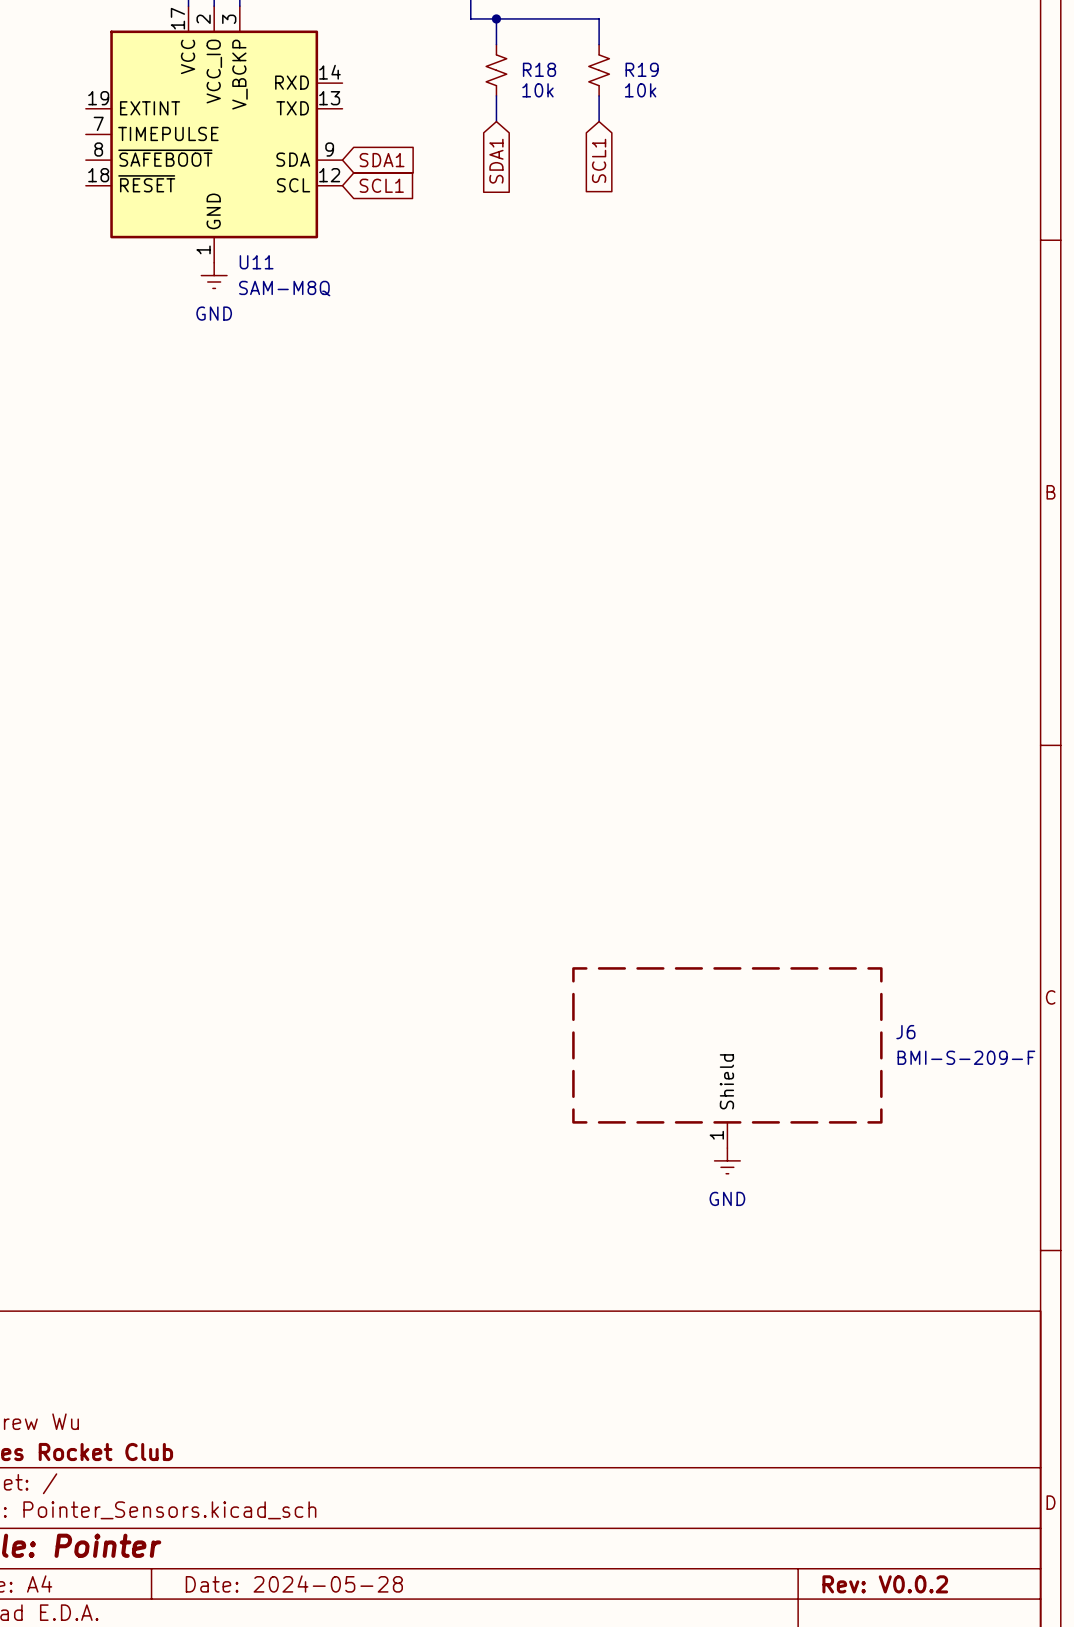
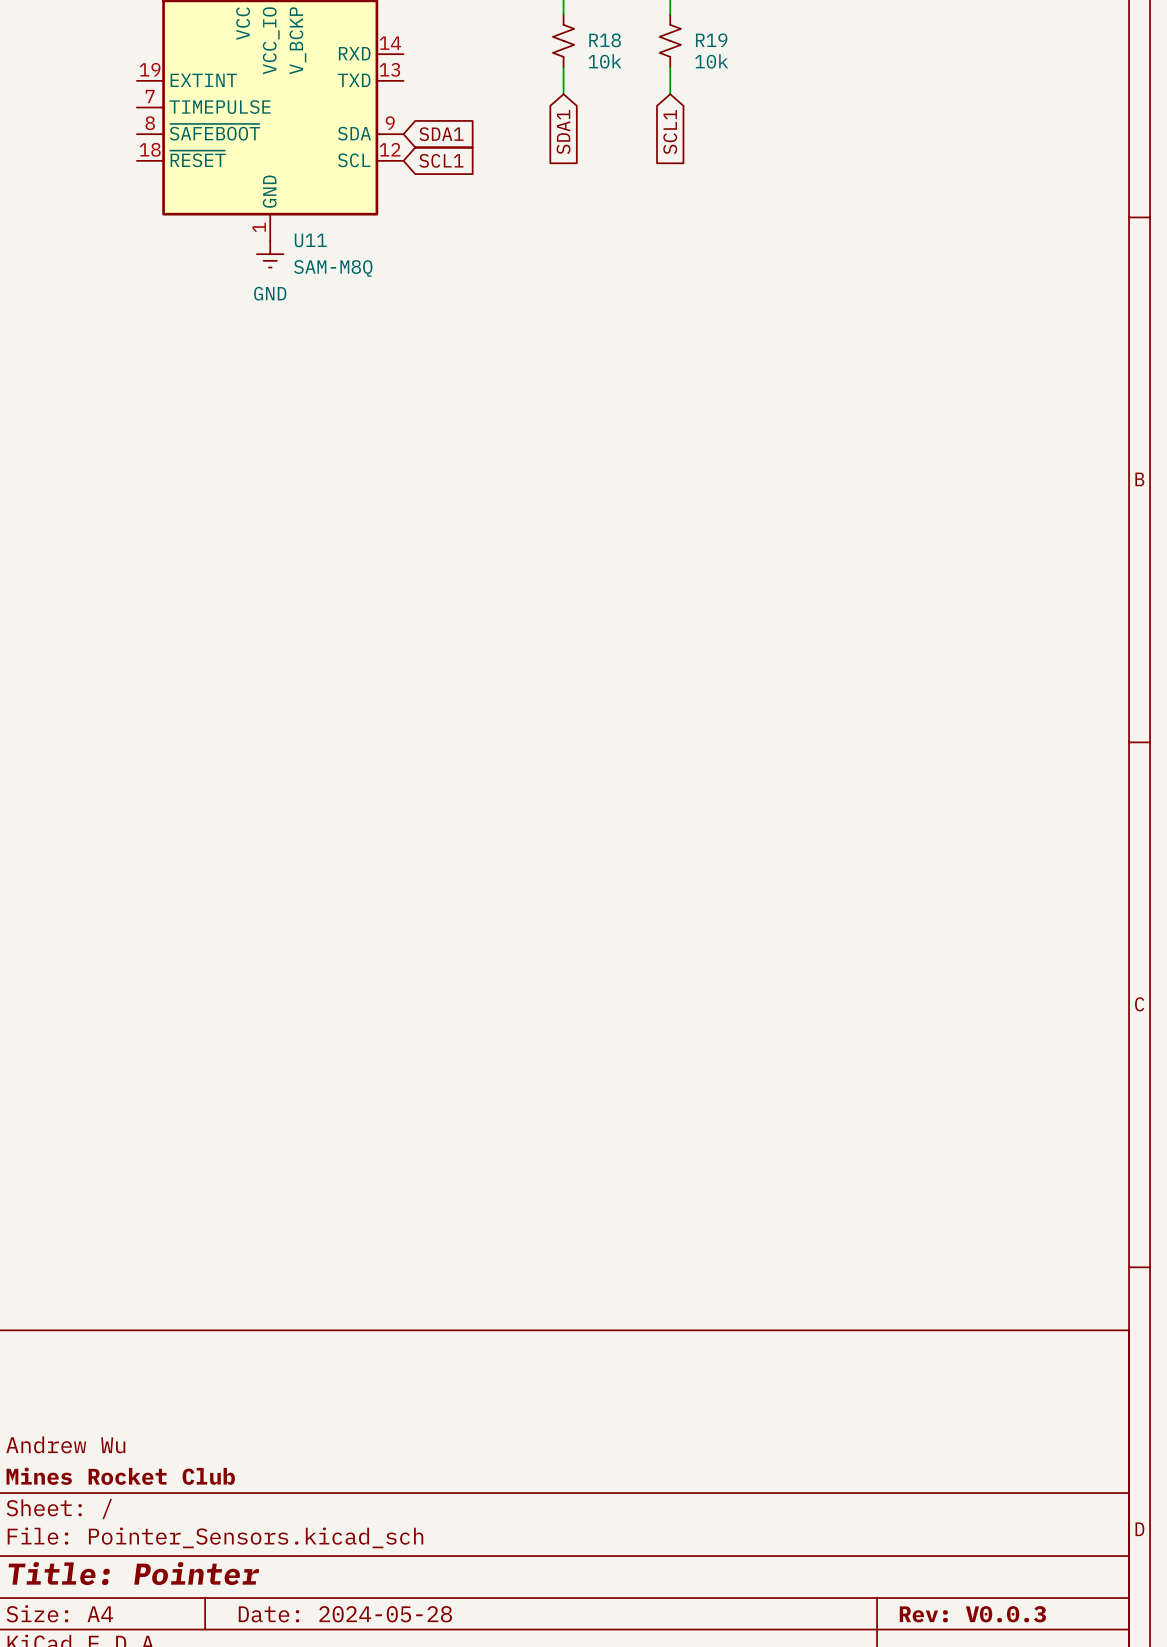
J6: BMI-S-209-F (727, 1057) -> none
power symbol: GND (727, 1160) -> none
title block: Rev: V0.0.2 (885, 1584) -> Rev: V0.0.3 (972, 1614)

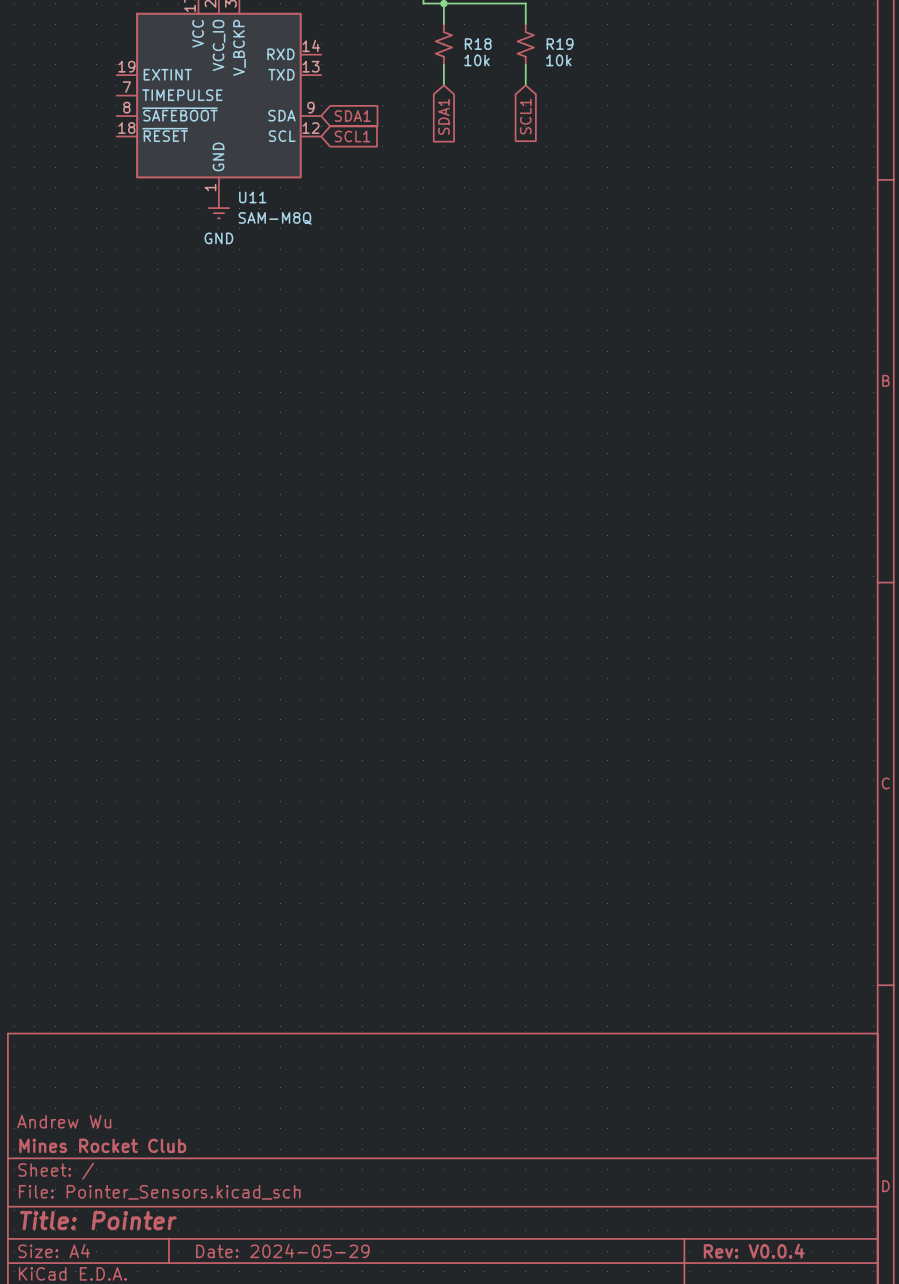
title block: Date: 2024-05-28 (345, 1614) -> Date: 2024-05-29 (282, 1251)
title block: Rev: V0.0.3 (972, 1614) -> Rev: V0.0.4 (754, 1251)

